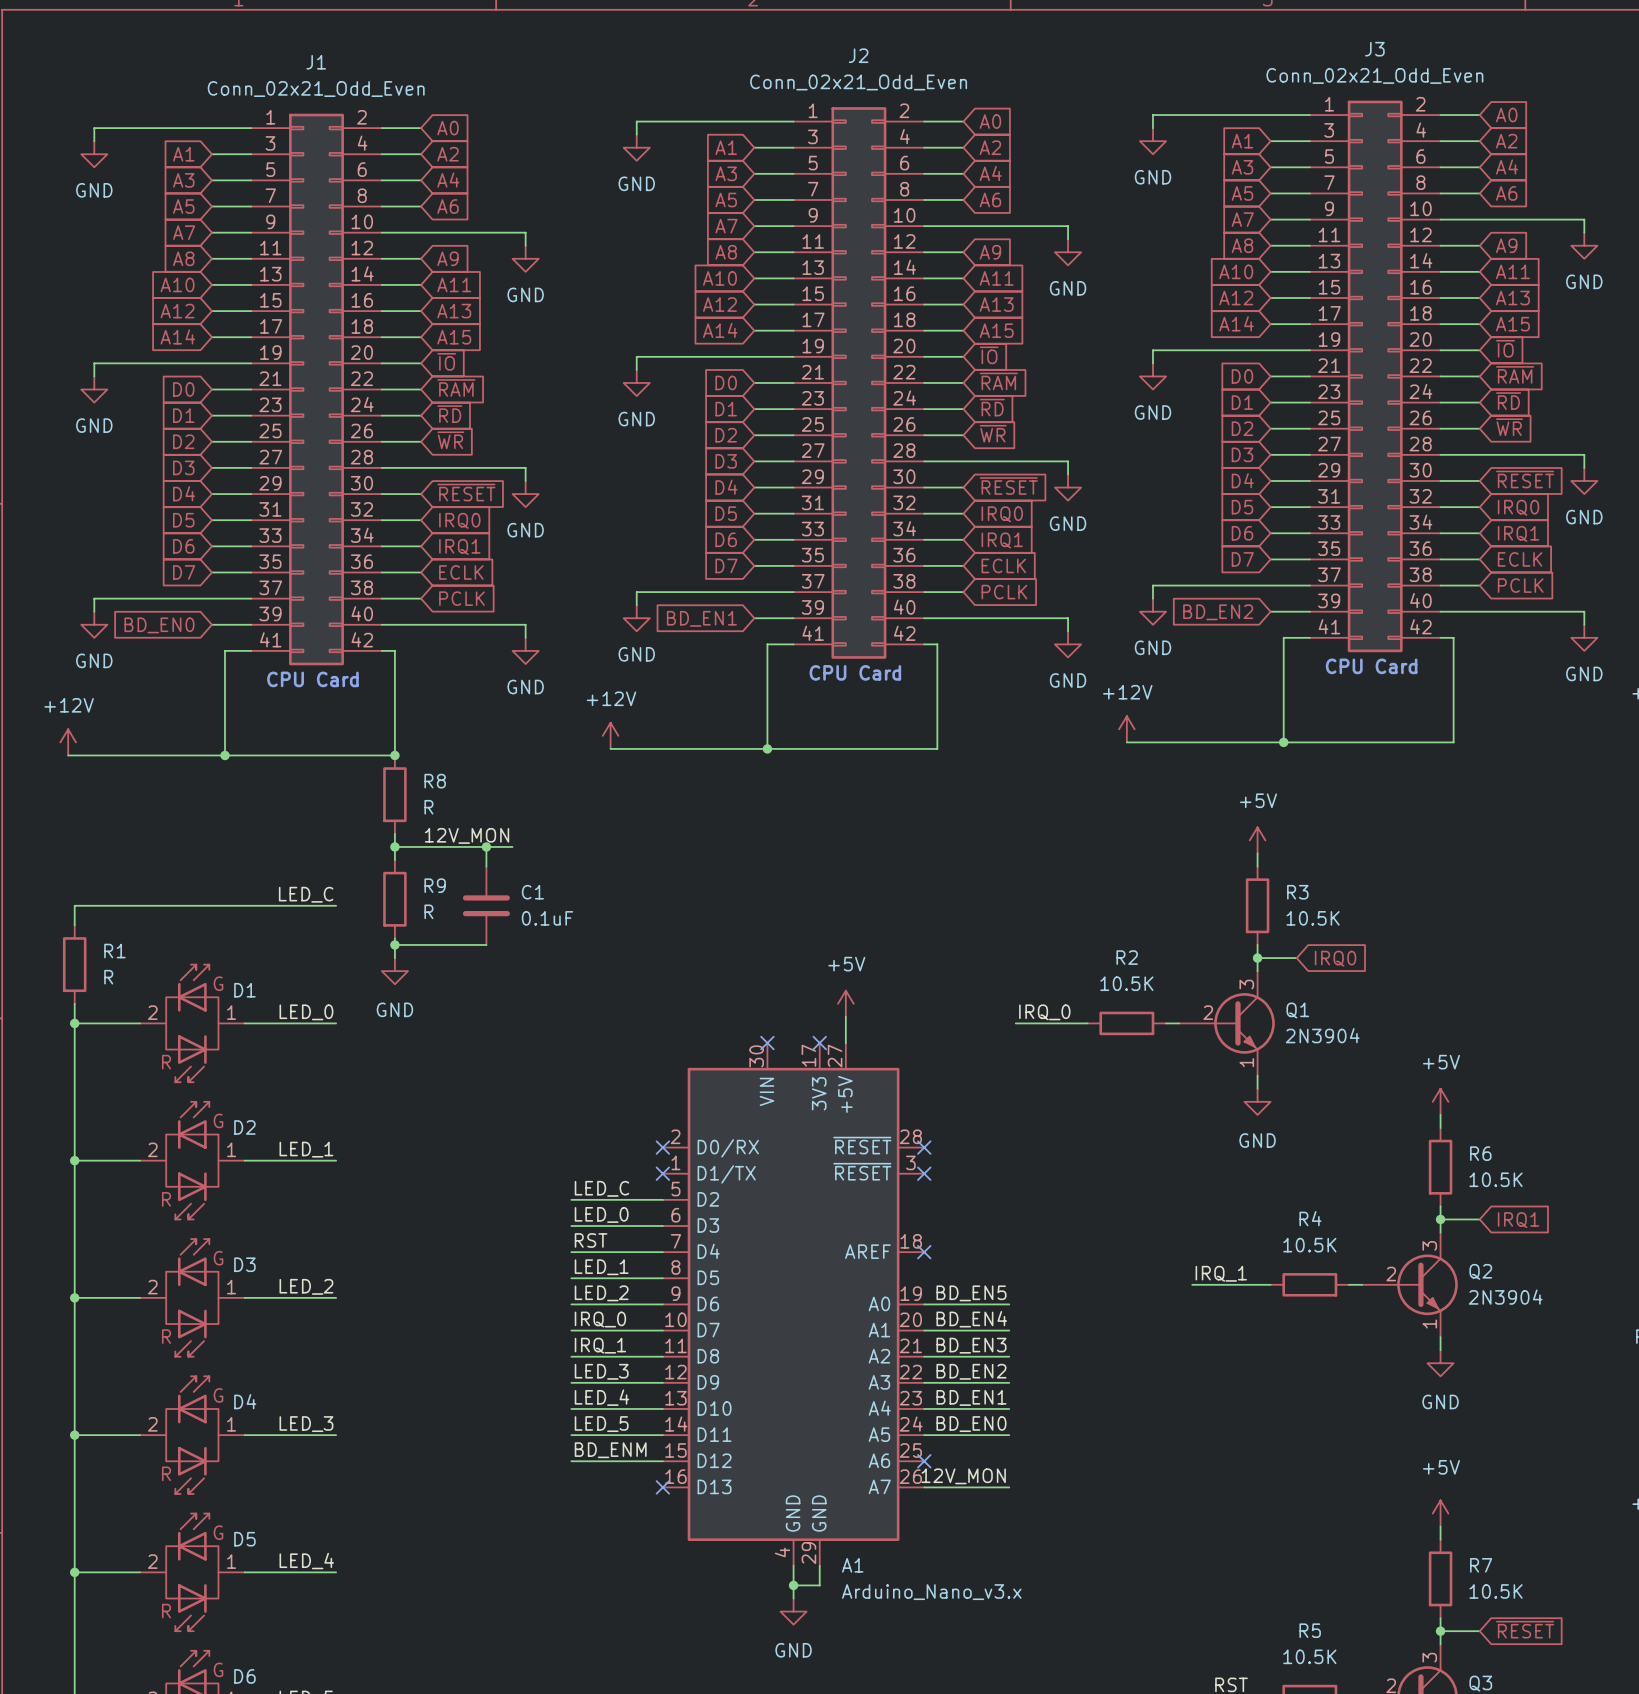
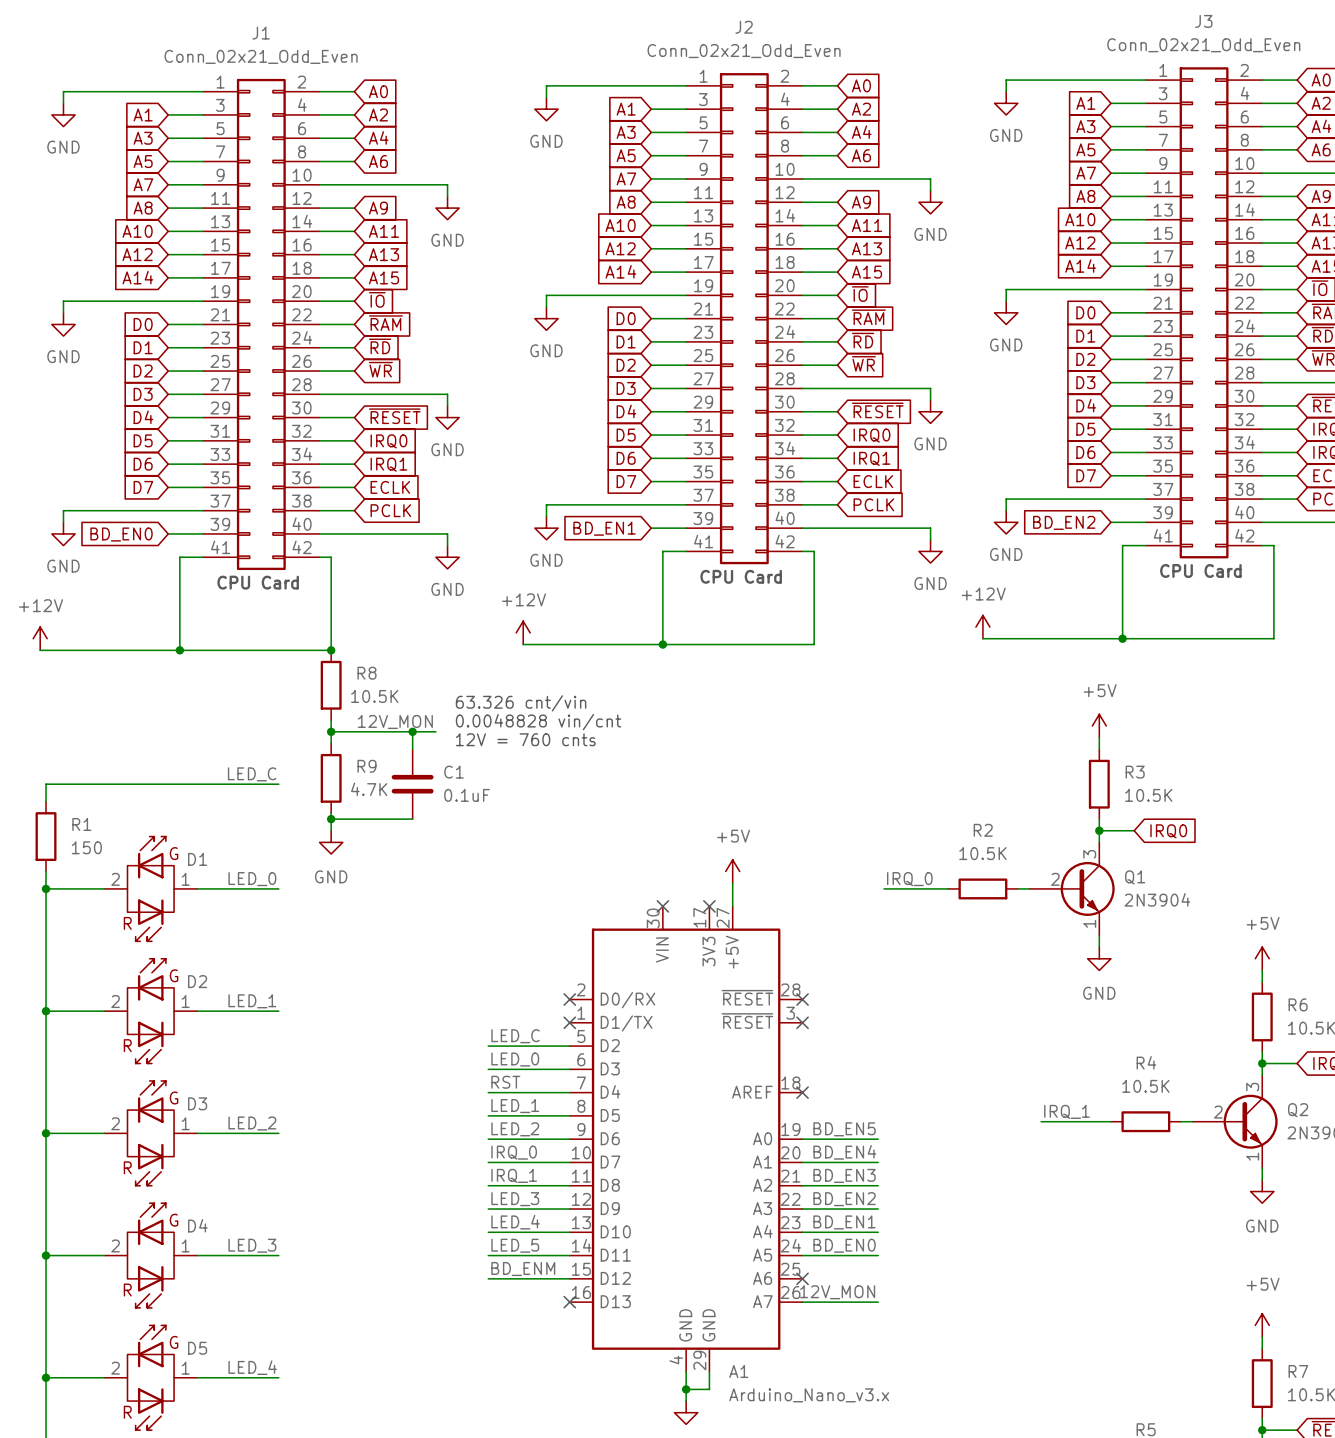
R8 value: R (428, 807) -> 10.5K (374, 696)
text: none -> 63.326 cnt/vin (521, 703)
text: none -> 0.0048828 vin/cnt (538, 722)
text: none -> 12V = 760 cnts (525, 739)
R9 value: R (428, 911) -> 4.7K (369, 789)
R1 value: R (108, 977) -> 150 (86, 847)

